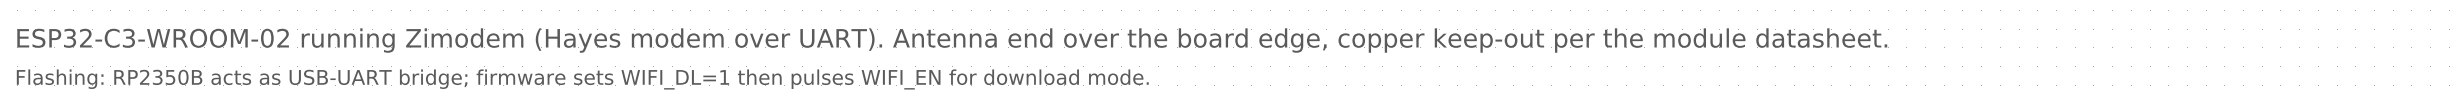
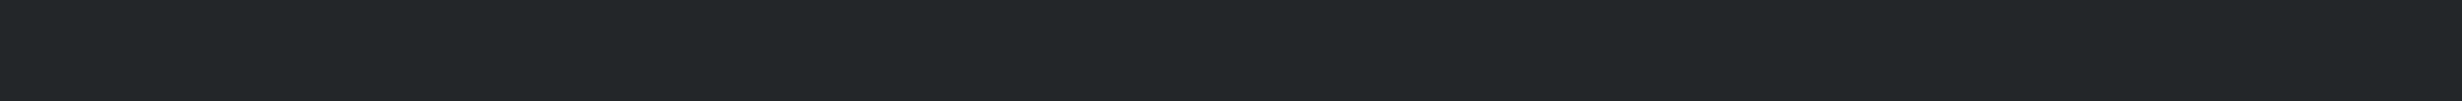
text: ESP32-C3-WROOM-02 running Zimodem (Hayes modem over UART). Antenna end over the board edge, copper keep-out per the module datasheet. (952, 40) -> none
text: Flashing: RP2350B acts as USB-UART bridge; firmware sets WIFI_DL=1 then pulses WIFI_EN for download mode. (582, 79) -> none

